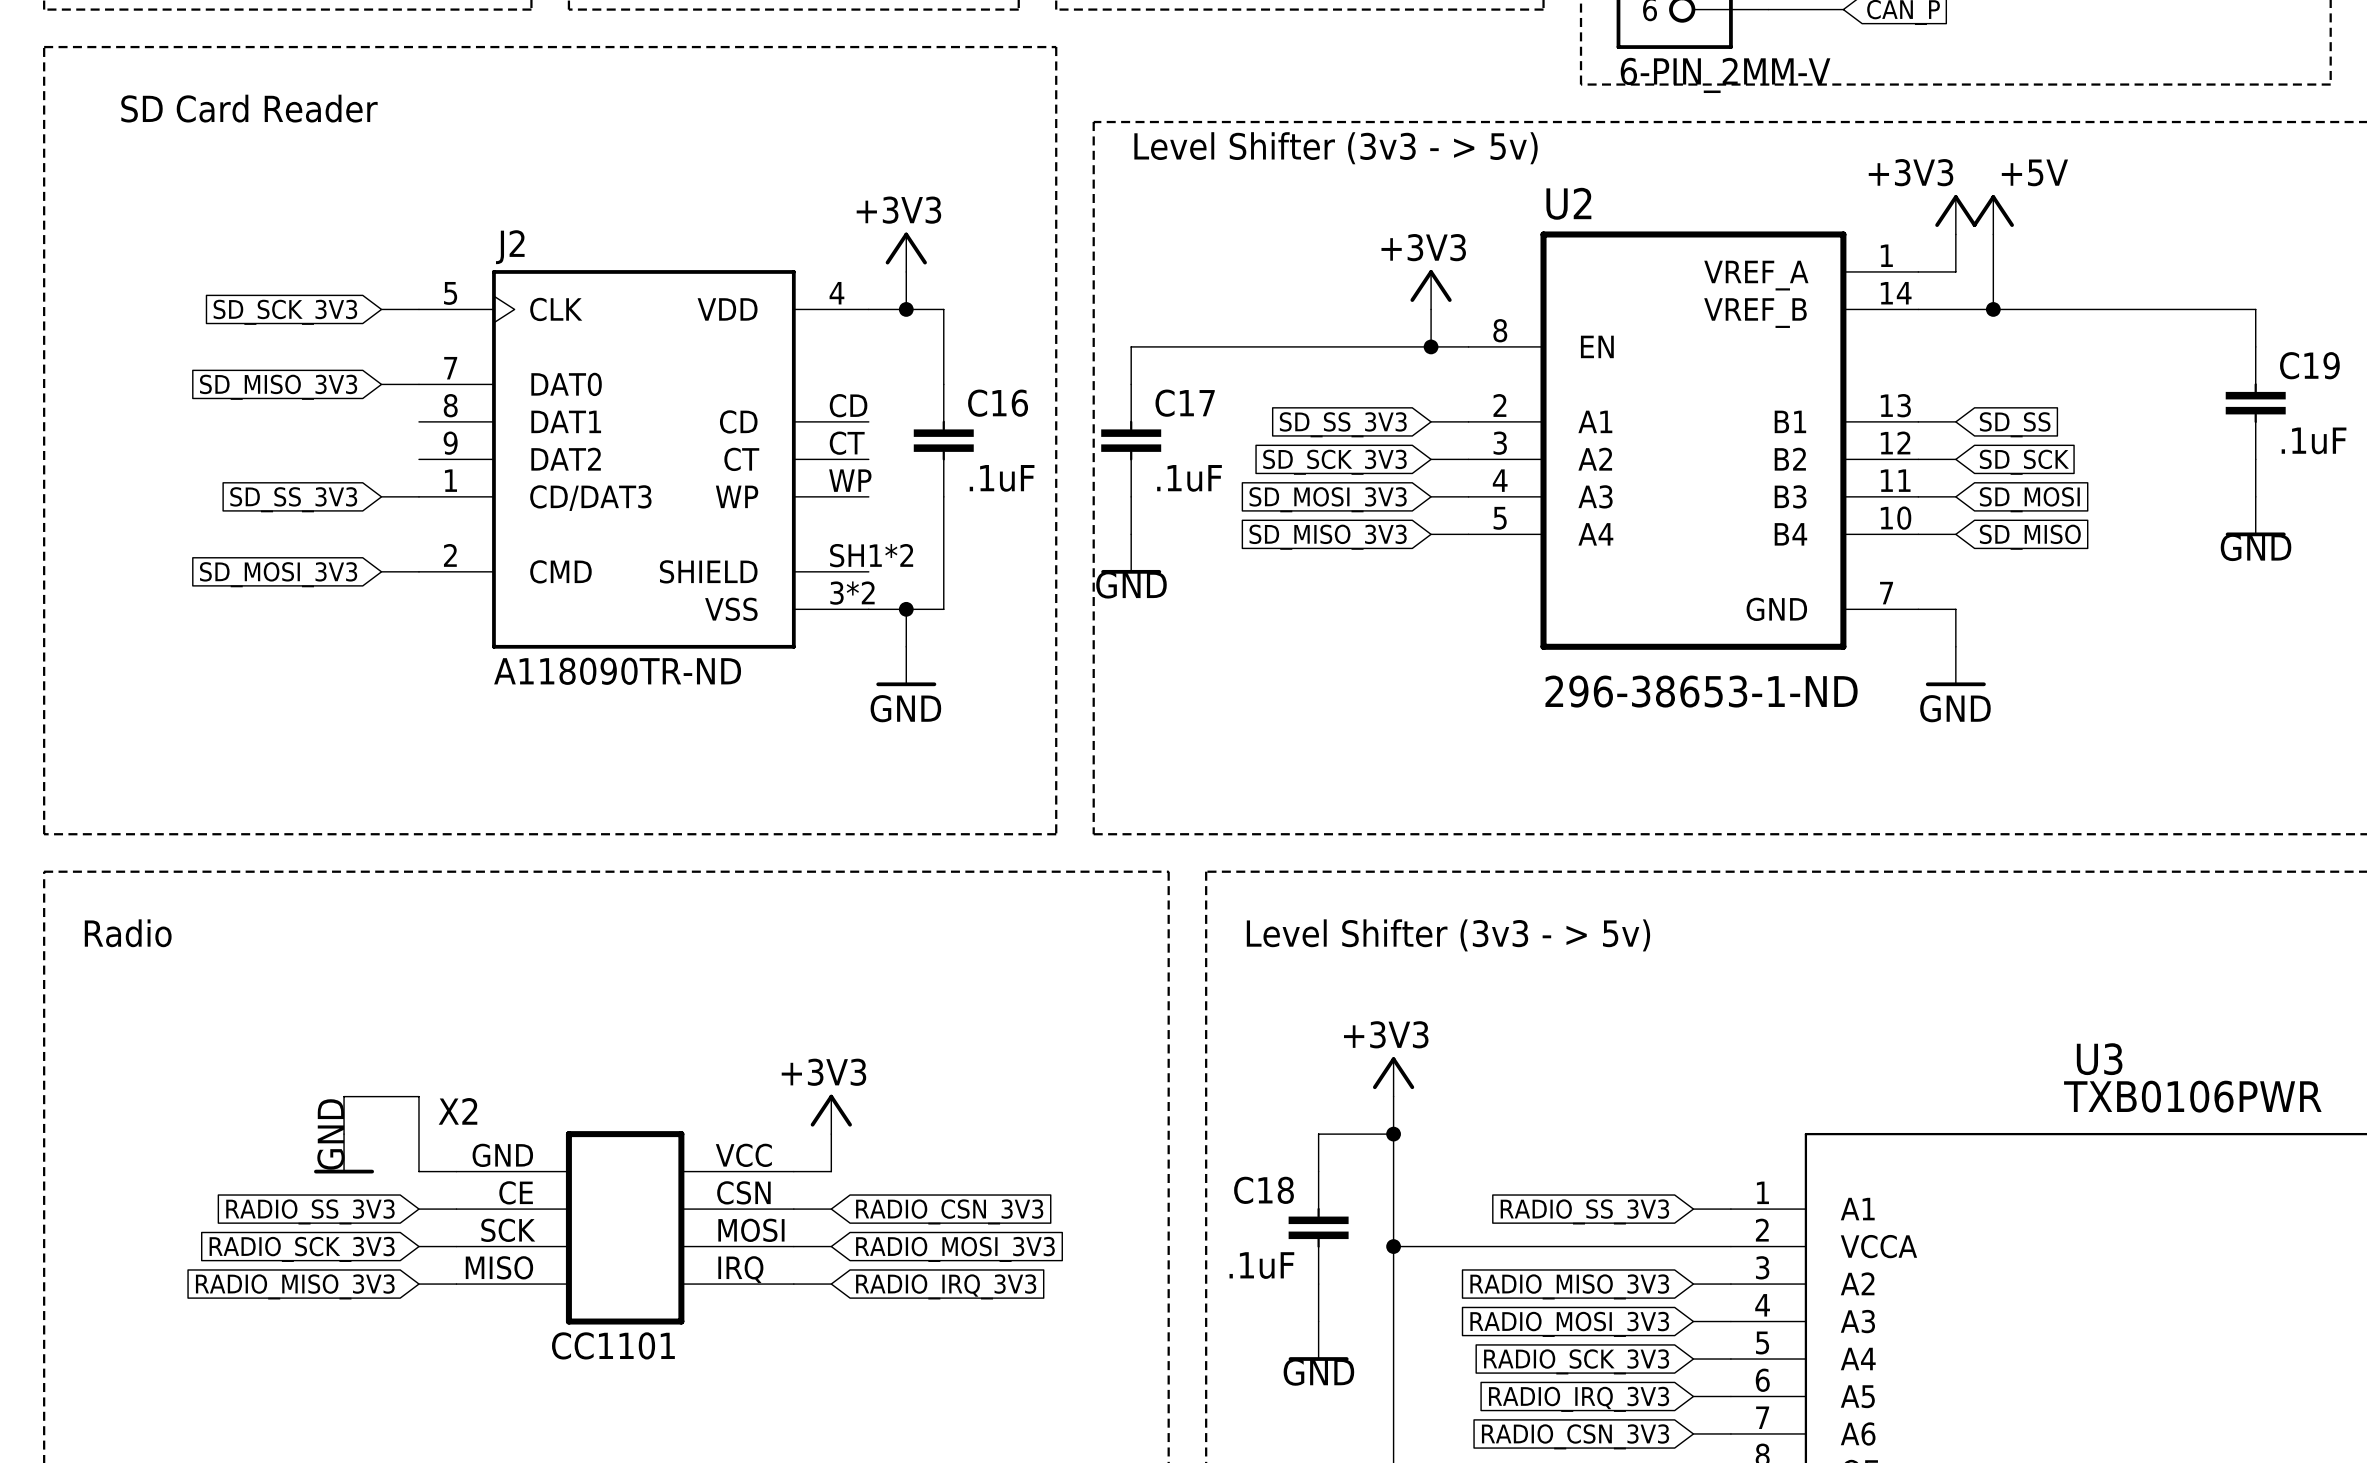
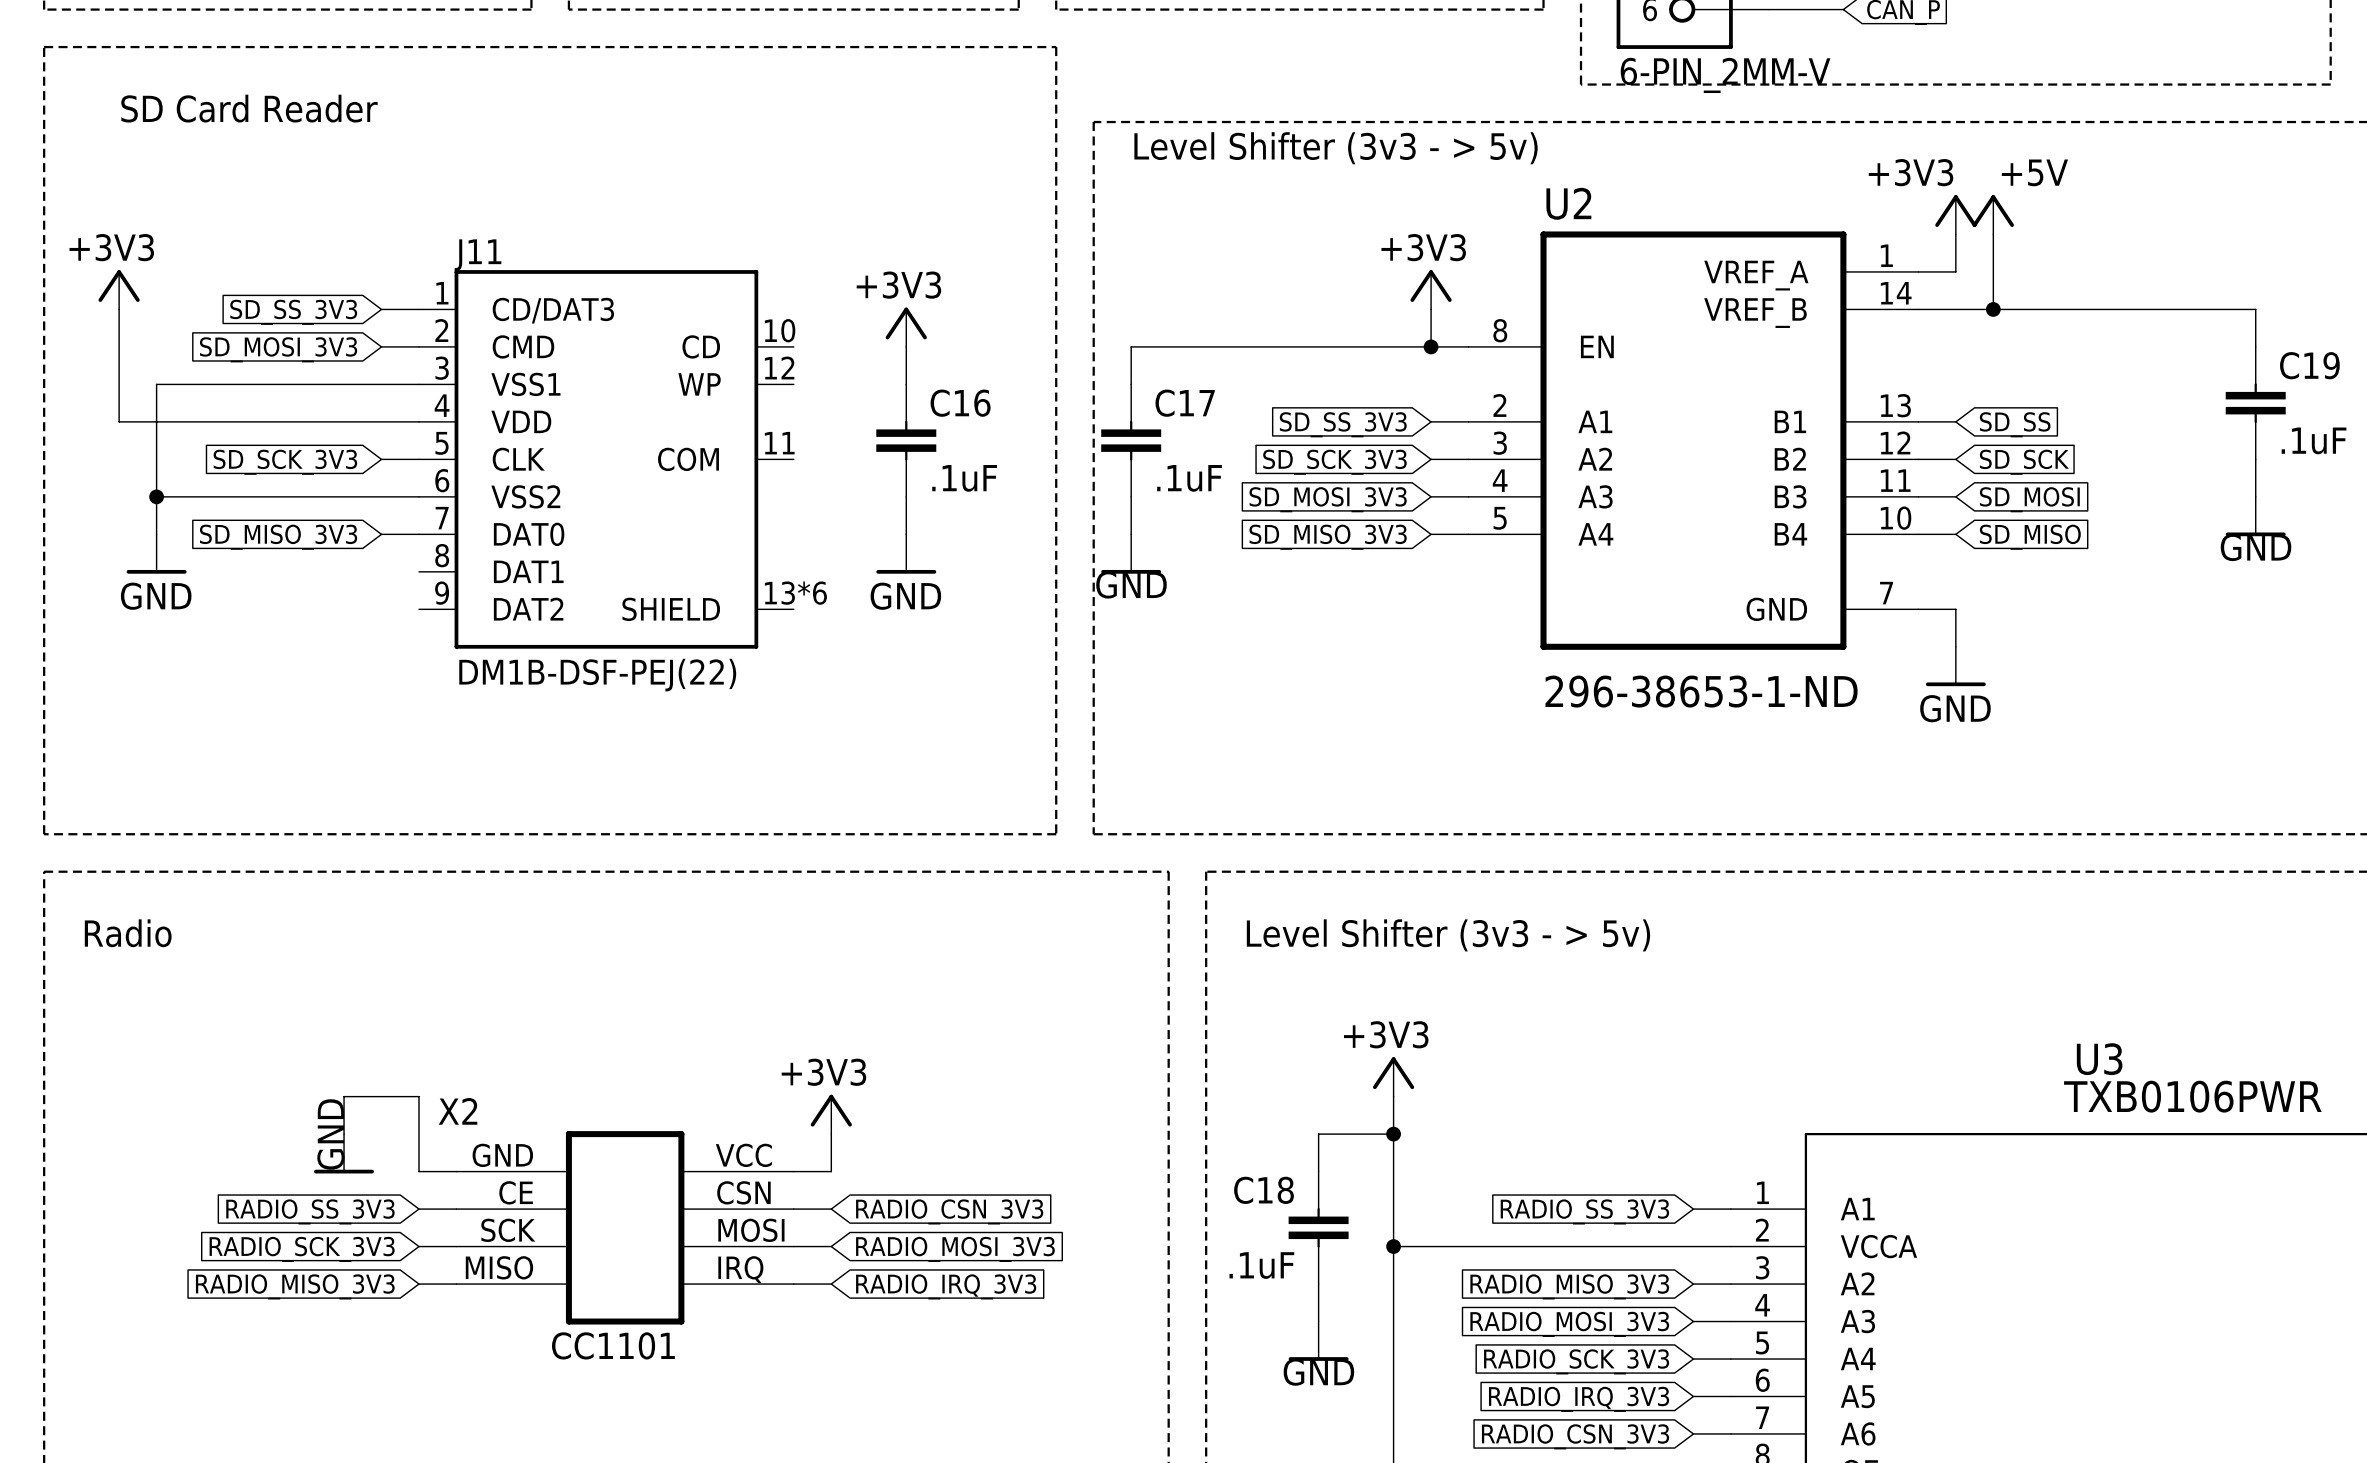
power symbol position: +3V3 (906, 252) -> +3V3 (906, 327)
wire: (906, 271) (906, 309) -> (906, 346) (906, 384)
power symbol: none -> +3V3 (119, 289)
wire: none -> (119, 309) (119, 421) (418, 421)
wire: (868, 309) (943, 309) (943, 384) -> none
junction: (906, 309) -> none
global label: SD_SCK_3V3 (285, 312) -> SD_SS_3V3 (293, 312)
wire: none -> (381, 346) (418, 346)
wire: none -> (381, 384) (156, 384) (156, 534)
global label position: SD_MISO_3V3 (278, 387) -> SD_MISO_3V3 (278, 537)
C16 position: (943, 440) -> (906, 440)
J11: none -> DM1B-DSF-PEJ(22) (606, 459)
J2: A118090TR-ND (643, 459) -> none
wire: none -> (156, 496) (381, 496)
junction: none -> (156, 496)
wire: (943, 496) (943, 609) (868, 609) -> none
global label: SD_SS_3V3 (293, 499) -> SD_SCK_3V3 (285, 462)
wire: none -> (381, 534) (418, 534)
power symbol: none -> GND (156, 554)
wire: (381, 571) (418, 571) -> (381, 459) (418, 459)
global label position: SD_MOSI_3V3 (278, 574) -> SD_MOSI_3V3 (278, 349)
wire: (906, 609) (906, 646) -> (906, 496) (906, 534)
junction: (906, 609) -> none
power symbol position: GND (906, 666) -> GND (906, 554)

